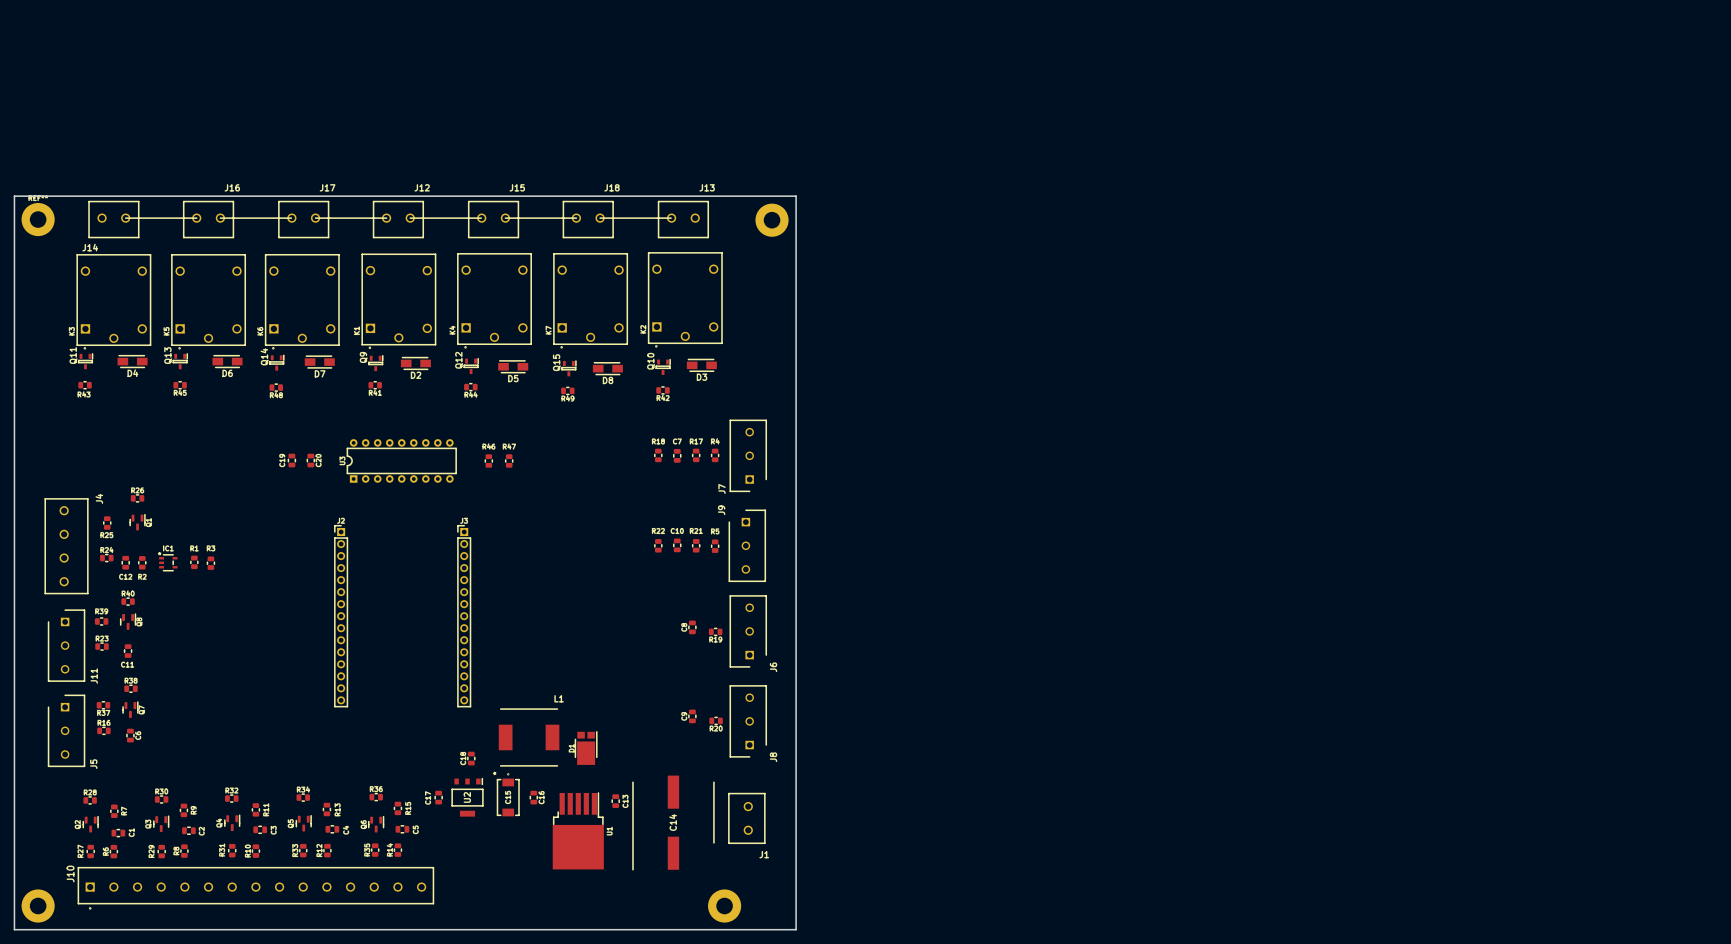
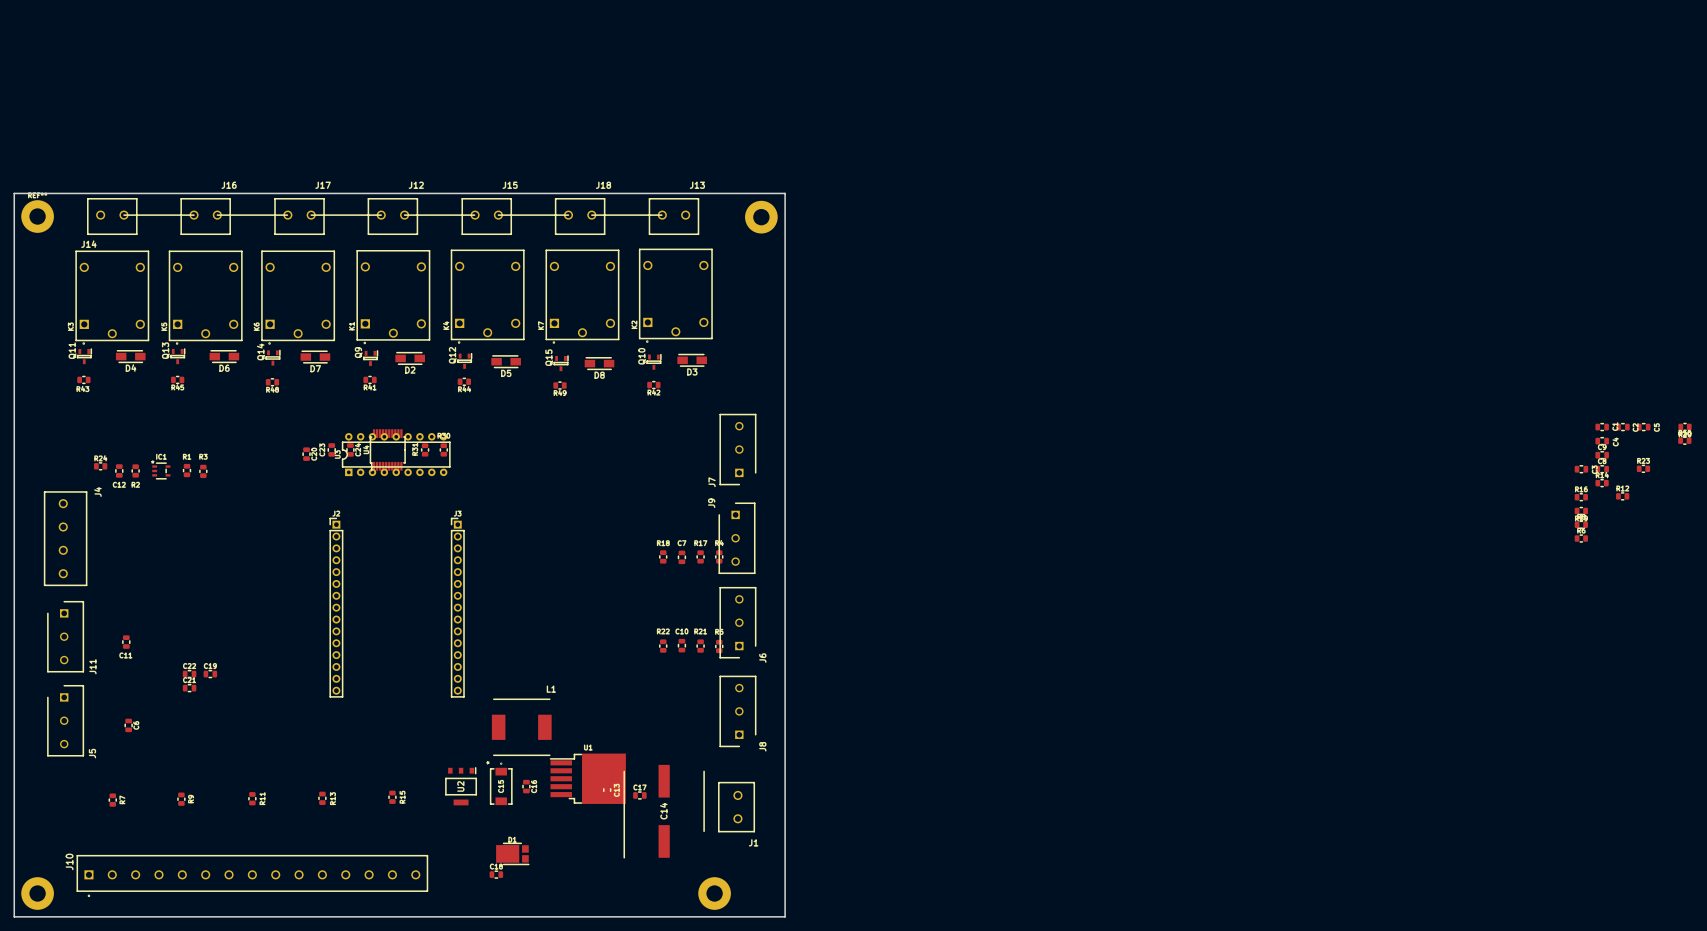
part position: (658, 455) -> (663, 556)
part position: (677, 455) -> (681, 557)
part position: (696, 455) -> (700, 556)
part position: (715, 455) -> (719, 556)
part: none -> (331, 449)
part: none -> (350, 449)
part: none -> (387, 450)
part rotation: 0° (291, 460) -> 90° clockwise (210, 674)
part position: (291, 460) -> (210, 674)
part: (488, 460) -> none
part: (509, 460) -> none
part: (137, 498) -> none
part: (137, 522) -> none
part: (107, 523) -> none
part position: (658, 545) -> (663, 646)
part position: (677, 545) -> (681, 645)
part position: (696, 545) -> (700, 646)
part position: (715, 546) -> (719, 646)
part position: (106, 558) -> (100, 466)
part position: (125, 562) -> (119, 470)
part position: (142, 562) -> (135, 470)
part position: (168, 562) -> (161, 470)
part position: (194, 562) -> (187, 470)
part position: (210, 563) -> (203, 471)
part: (128, 601) -> none
part: (101, 621) -> none
part: (128, 621) -> none
part rotation: 0° (692, 627) -> 90° clockwise (1602, 469)
part position: (692, 627) -> (1602, 469)
part position: (715, 631) -> (1581, 510)
part position: (102, 646) -> (1643, 468)
part: none -> (189, 674)
part: (130, 688) -> none
part: none -> (189, 688)
part: (103, 705) -> none
part: (130, 709) -> none
part rotation: 0° (692, 716) -> 90° clockwise (1602, 455)
part position: (692, 716) -> (1602, 455)
part position: (716, 720) -> (1685, 426)
part position: (103, 730) -> (1581, 497)
part rotation: 0° (586, 748) -> 90° clockwise (512, 853)
part position: (586, 748) -> (512, 853)
part rotation: 0° (471, 758) -> 90° clockwise (496, 874)
part position: (471, 758) -> (496, 874)
part: (303, 797) -> none
part: (376, 797) -> none
part rotation: 0° (438, 797) -> 90° clockwise (639, 795)
part position: (438, 797) -> (639, 795)
part: (231, 798) -> none
part rotation: 0° (161, 799) -> 90° clockwise (443, 449)
part position: (161, 799) -> (443, 449)
part: (90, 800) -> none
part: (161, 823) -> none
part: (232, 823) -> none
part: (303, 823) -> none
part: (90, 824) -> none
part: (376, 824) -> none
part position: (260, 829) -> (1581, 469)
part position: (332, 829) -> (1602, 441)
part position: (402, 829) -> (1643, 427)
part position: (188, 830) -> (1622, 427)
part rotation: 0° (578, 831) -> 90° counterclockwise (588, 778)
part position: (118, 833) -> (1602, 427)
part position: (232, 850) -> (425, 449)
part: (303, 850) -> none
part rotation: 0° (327, 850) -> 90° clockwise (1622, 496)
part position: (327, 850) -> (1622, 496)
part: (375, 850) -> none
part rotation: 0° (397, 850) -> 90° clockwise (1602, 483)
part position: (397, 850) -> (1602, 483)
part: (90, 851) -> none
part rotation: 0° (113, 851) -> 90° clockwise (1581, 538)
part position: (113, 851) -> (1581, 538)
part: (161, 851) -> none
part rotation: 0° (184, 851) -> 90° clockwise (1581, 524)
part position: (184, 851) -> (1581, 524)
part rotation: 0° (255, 851) -> 90° clockwise (1684, 440)
part position: (255, 851) -> (1684, 440)

